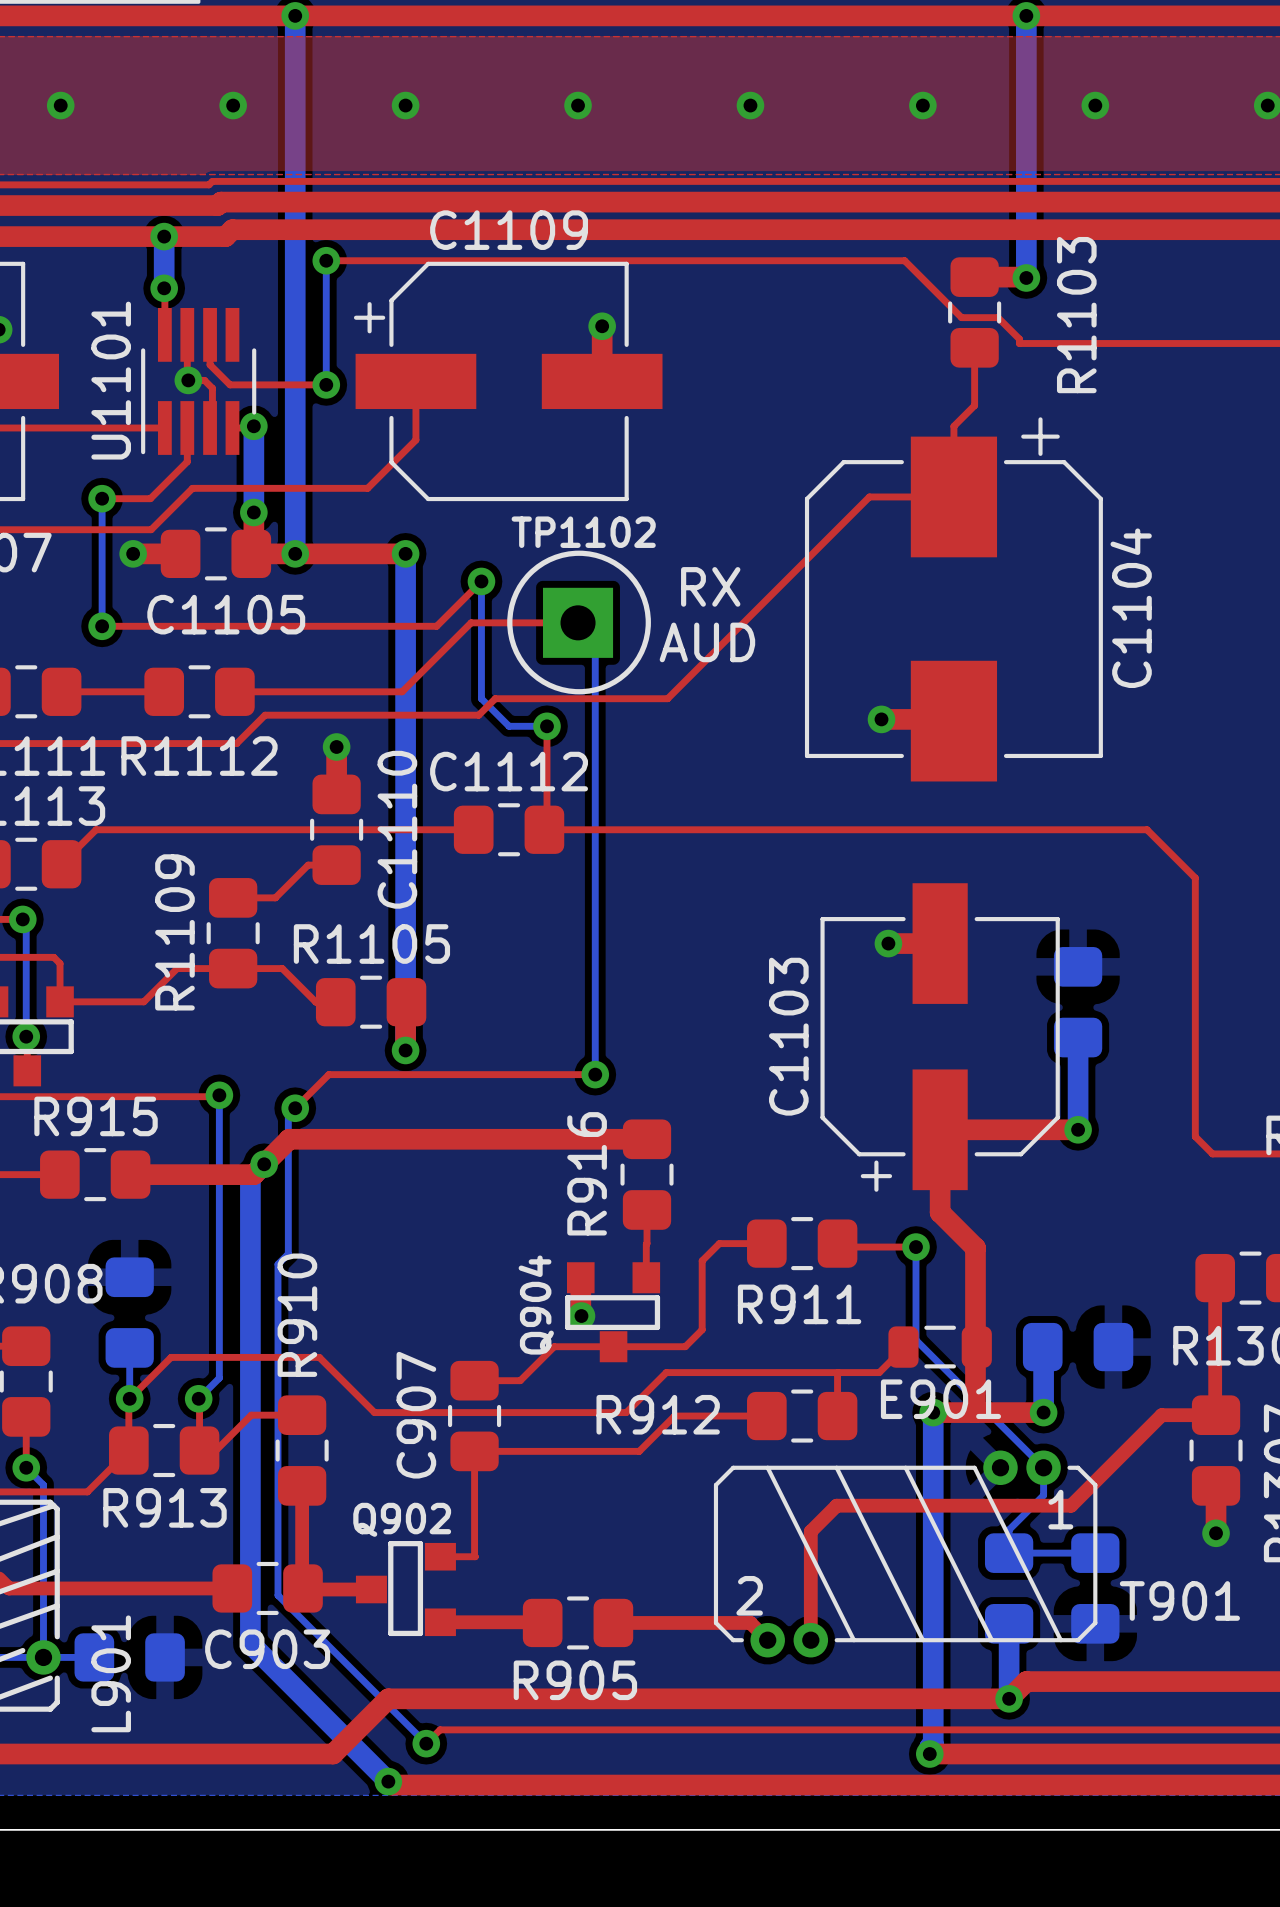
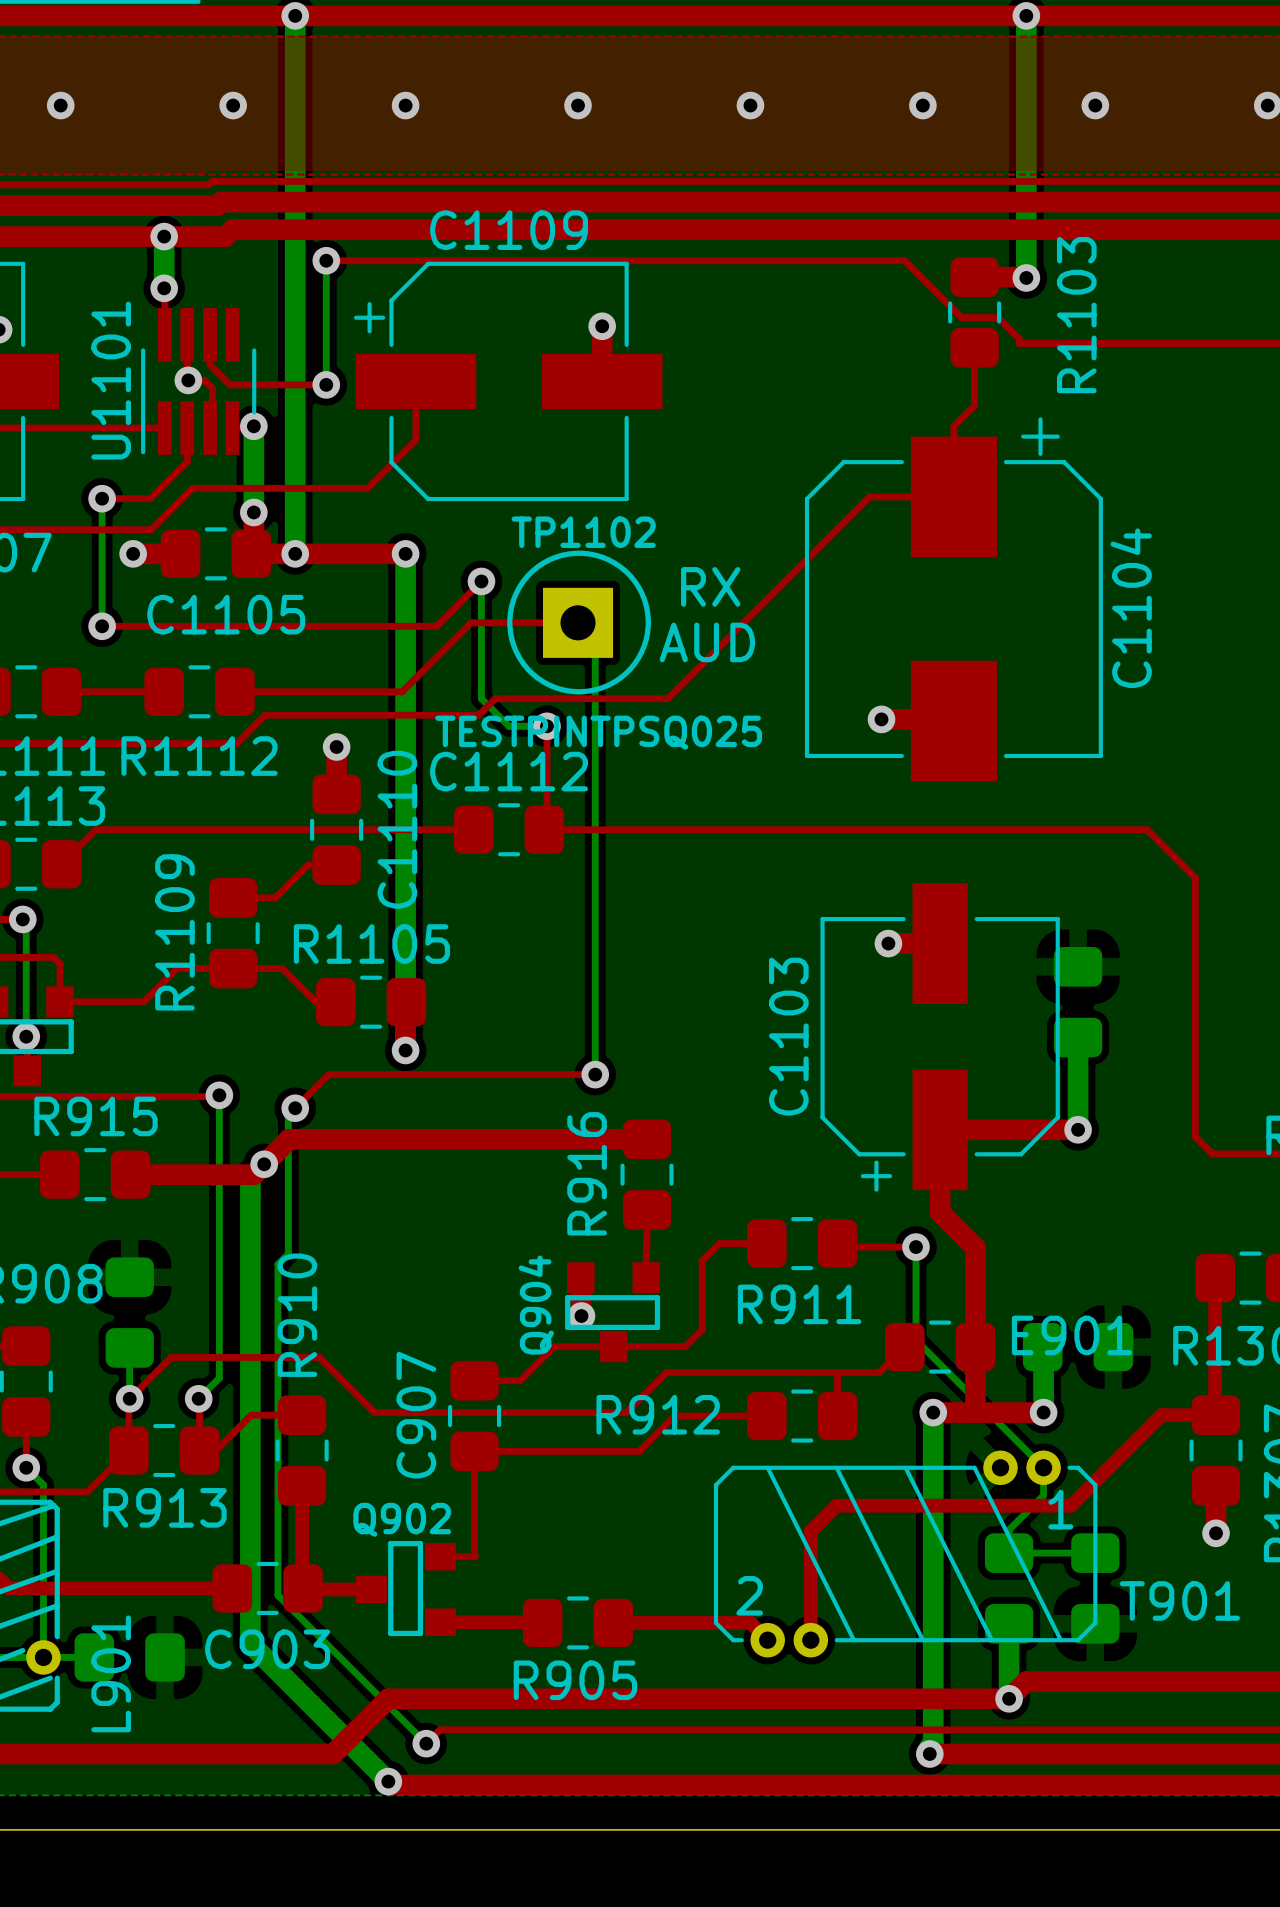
TP1102 value: none -> TESTPINTPSQ025 (598, 732)
E901 footprint: [888, 1325, 992, 1369] -> [884, 1320, 996, 1374]
E901 name position: E901 (940, 1399) -> E901 (1072, 1335)

